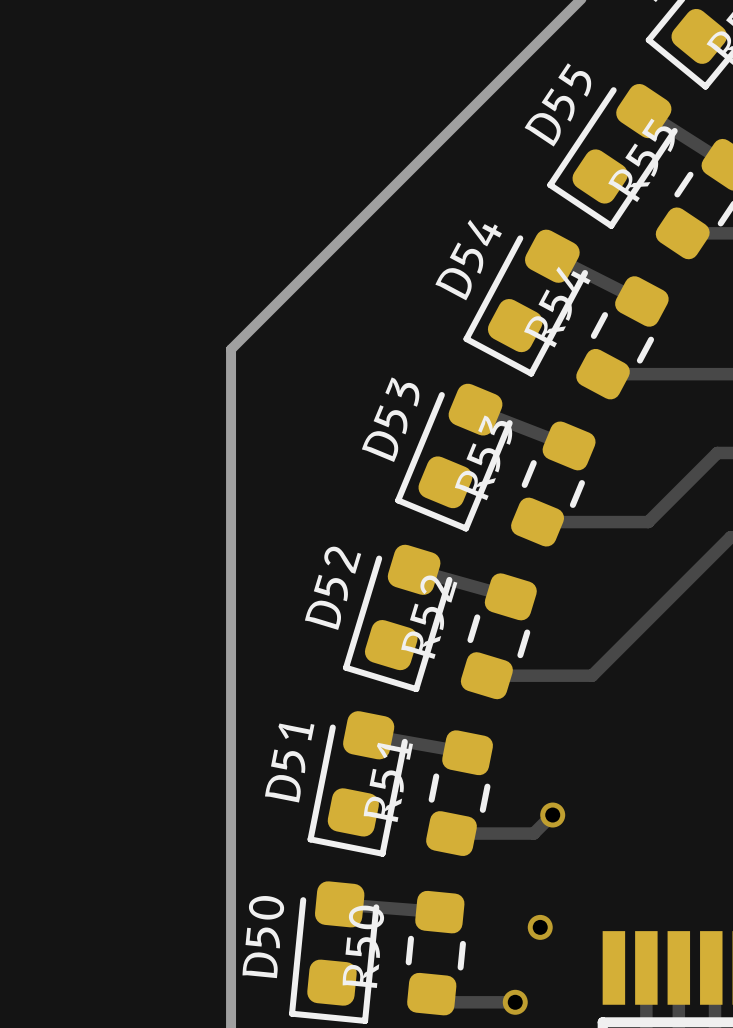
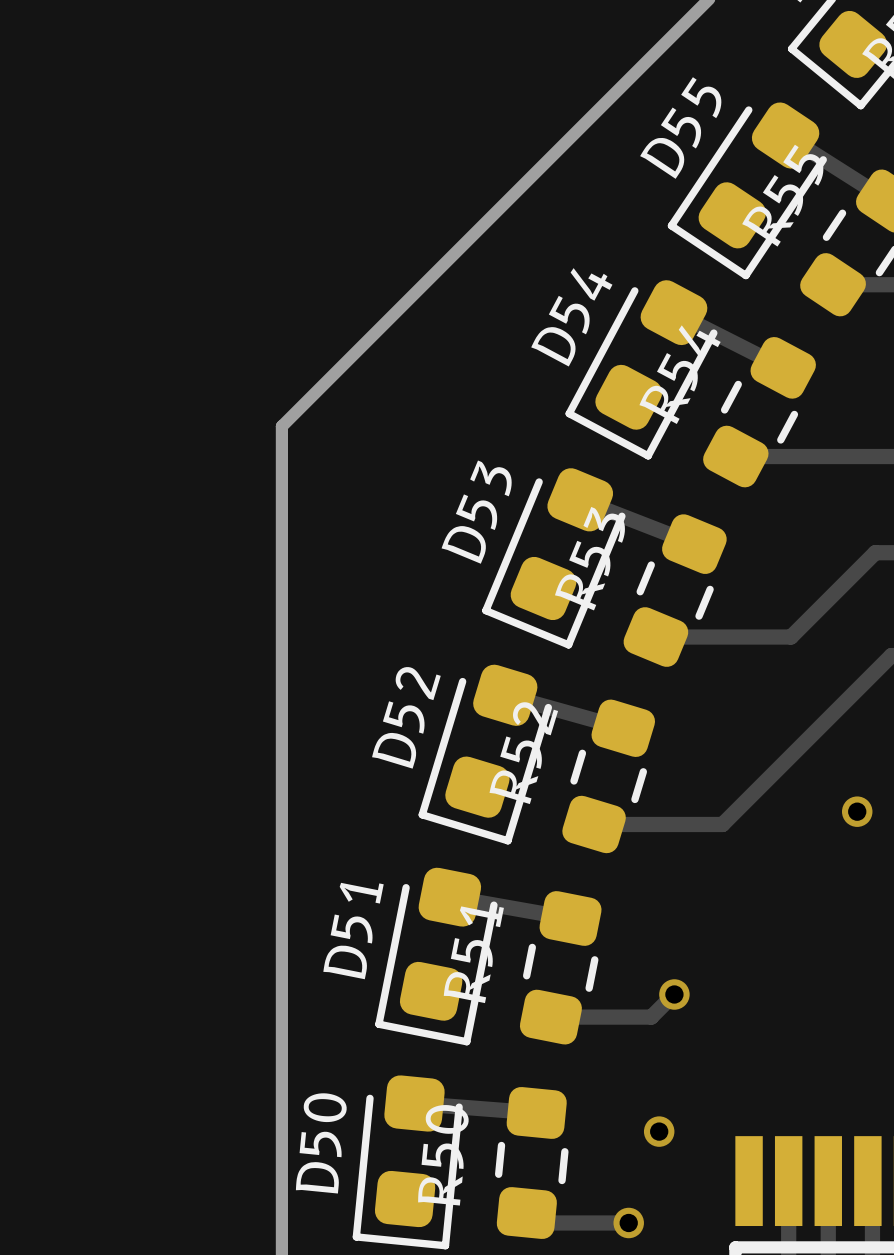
via: none -> (857, 811)

